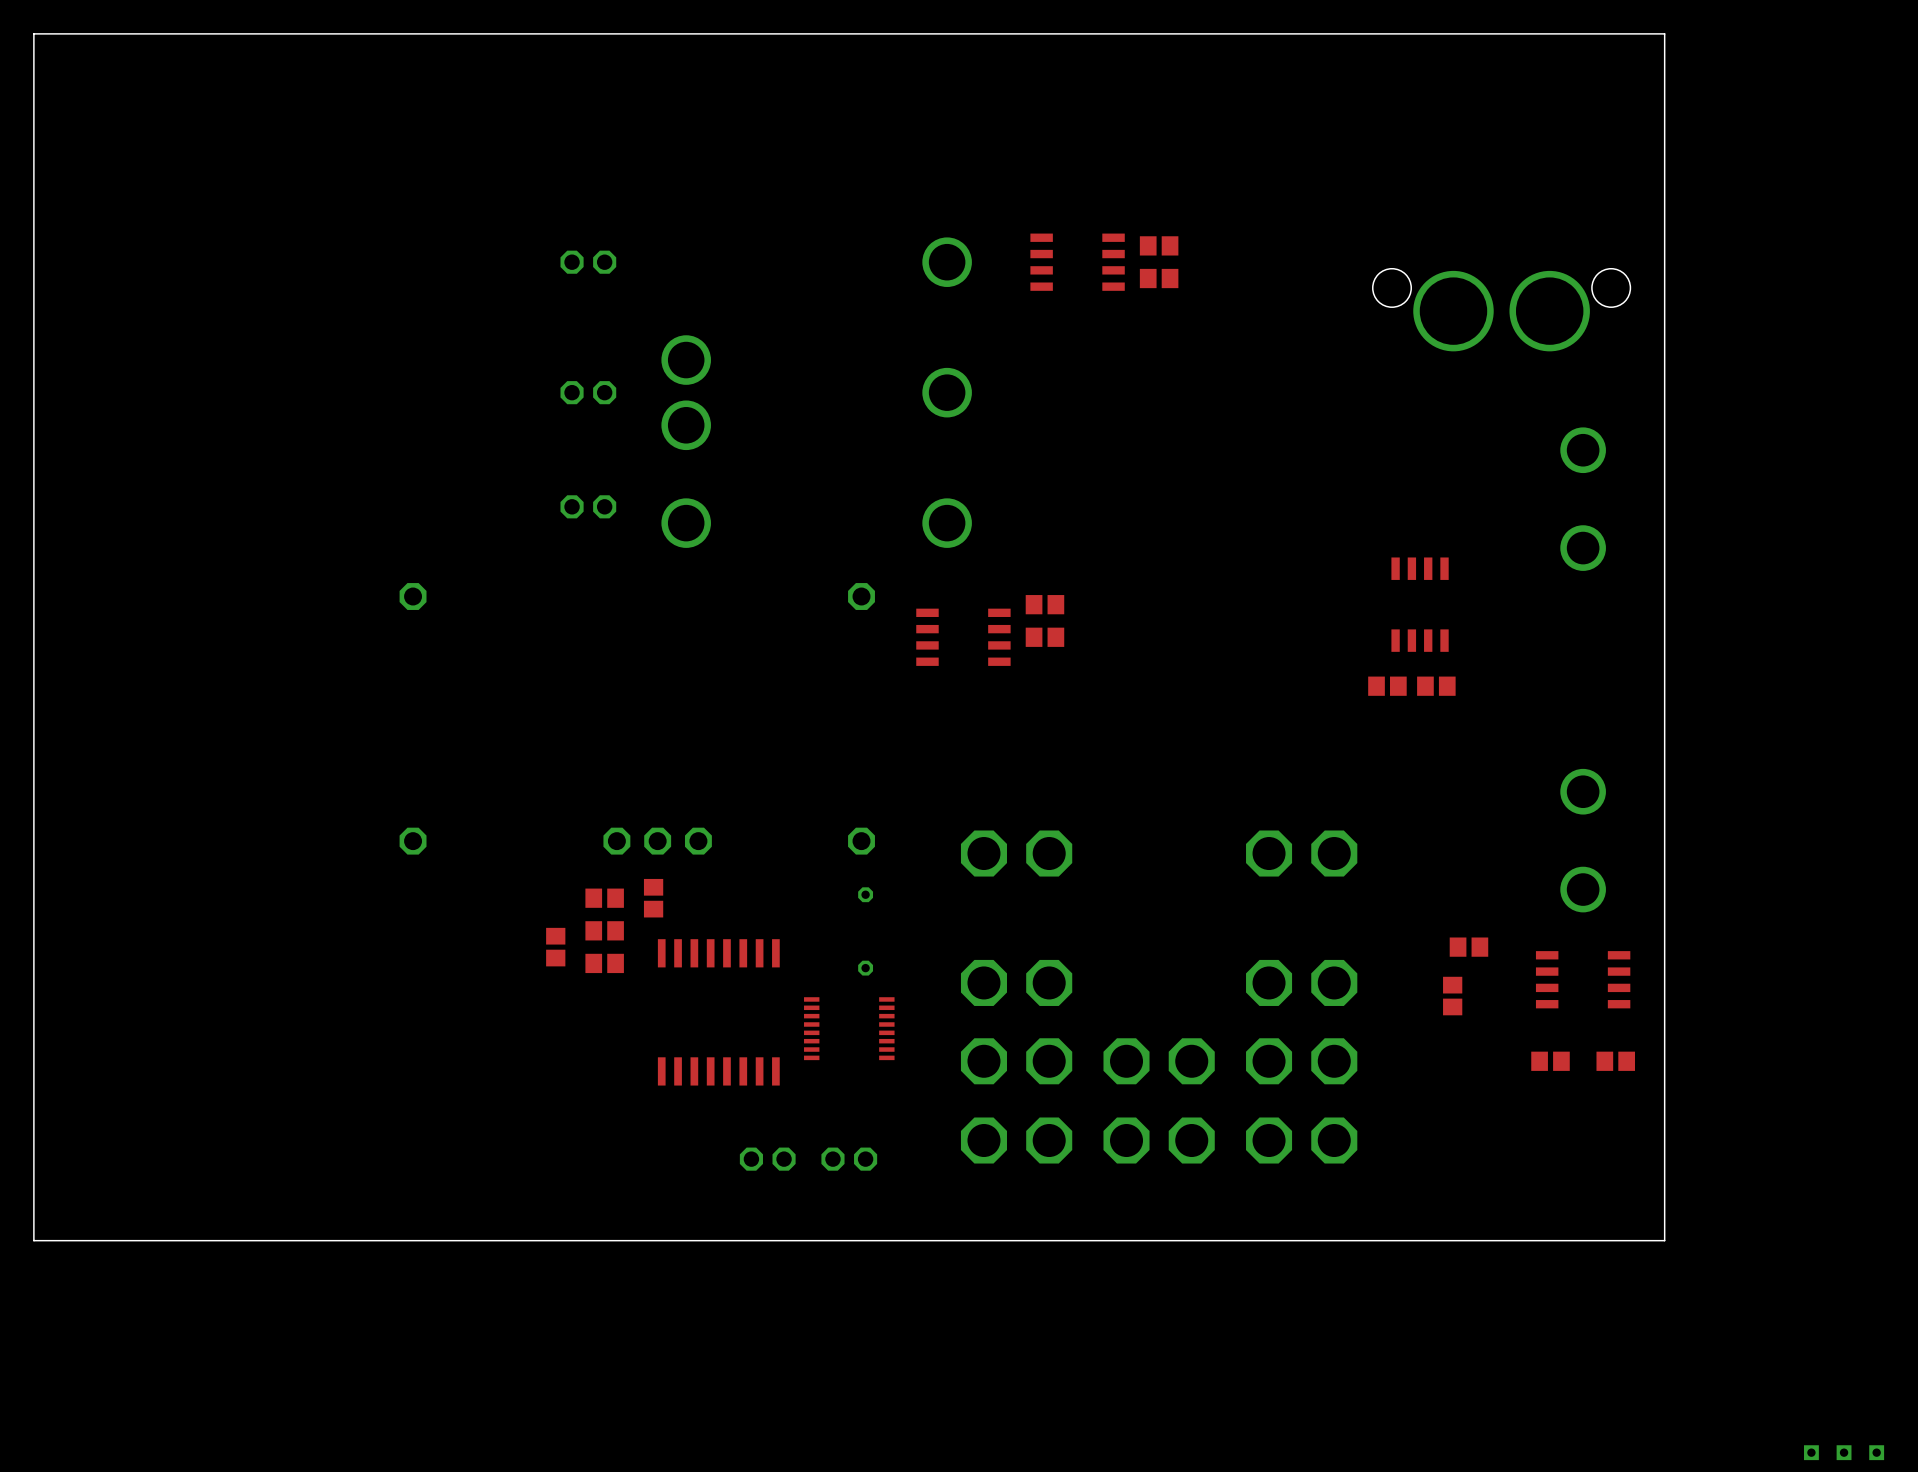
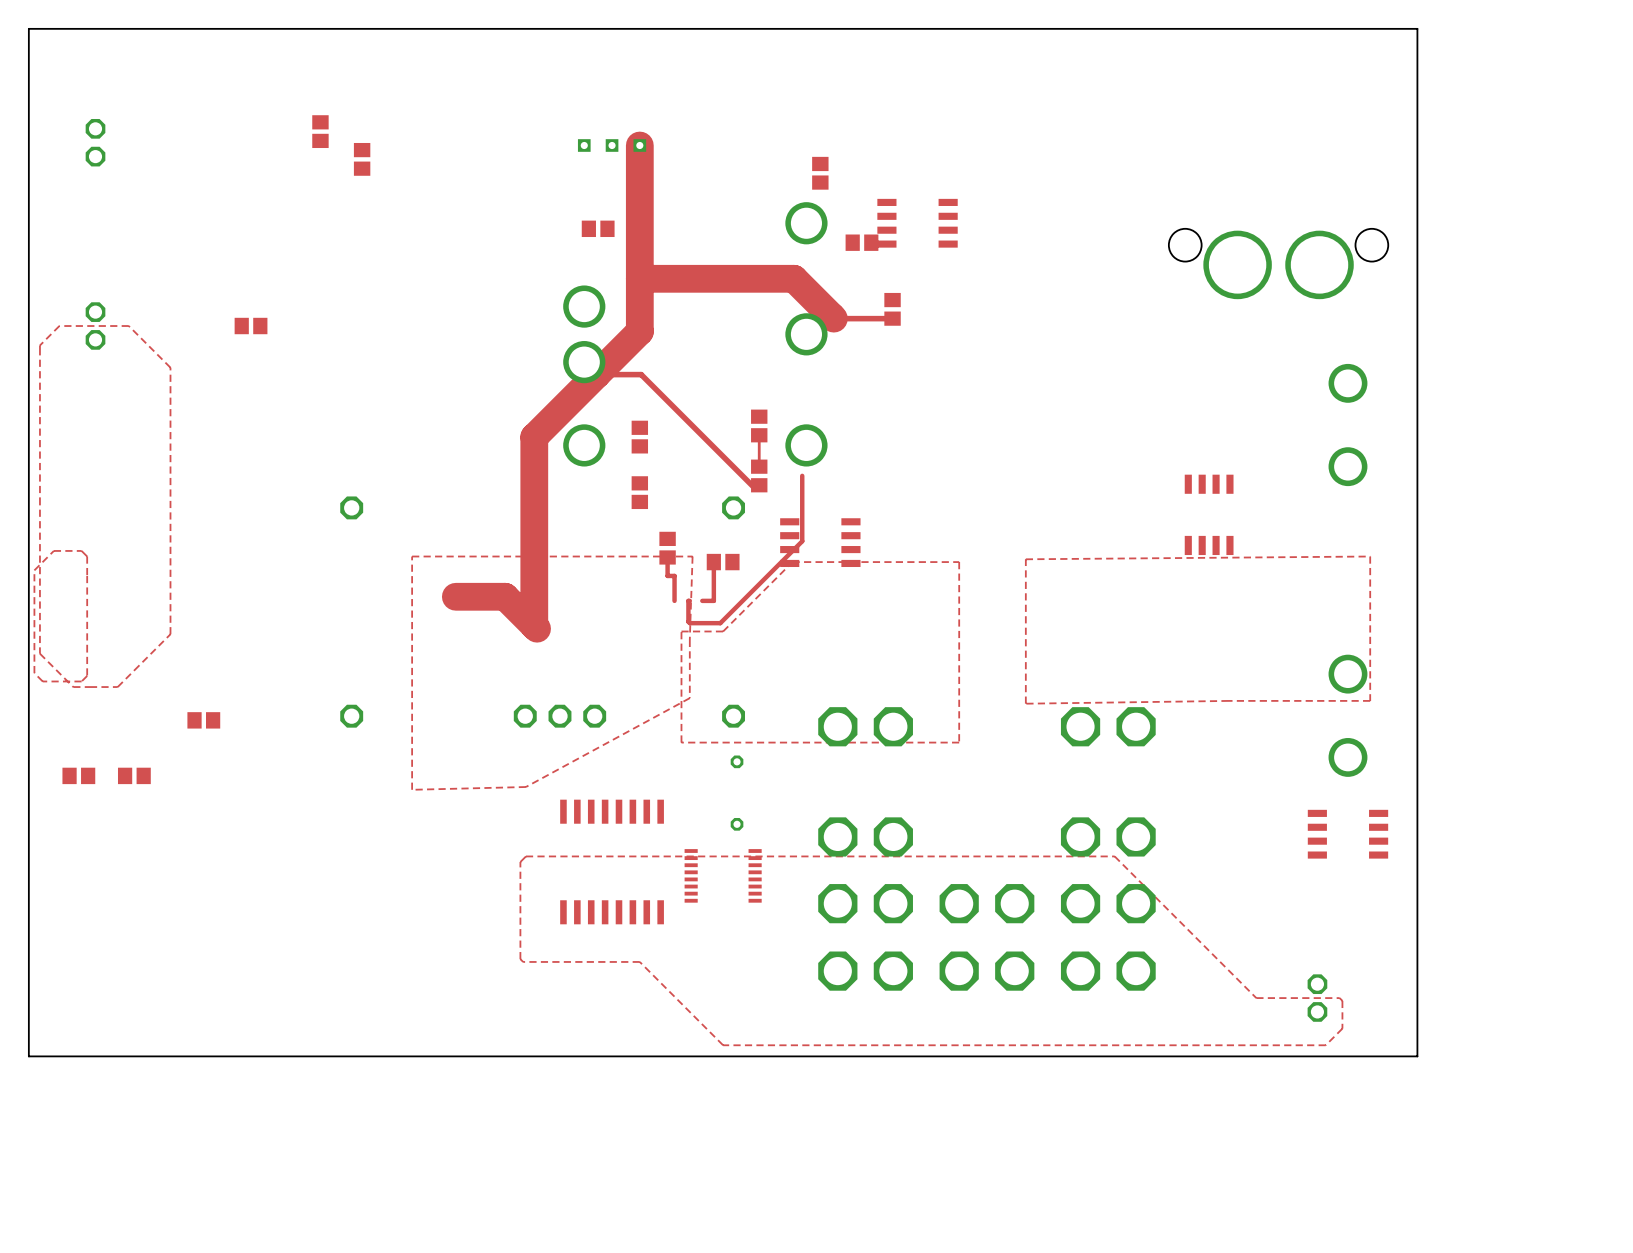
part: none -> (320, 131)
part: none -> (95, 142)
part: none -> (612, 145)
top track: none -> (639, 145) (639, 331) (534, 437) (534, 625)
part: none -> (362, 159)
part: none -> (820, 173)
part: (1159, 245) -> none
part: (588, 262) -> none
part: none -> (598, 228)
part: (1159, 278) -> none
part: none -> (861, 242)
top track: none -> (639, 278) (794, 278) (833, 318) (892, 318)
part: none -> (892, 309)
part: none -> (95, 326)
top zone outline: none -> (128, 326) (170, 367) (170, 634) (117, 687) (73, 687) (39, 653) (39, 345) (59, 326) (128, 326)
part: none -> (251, 326)
part: (588, 392) -> none
top track: none -> (596, 374) (641, 374) (753, 487)
part: none -> (759, 425)
part: (588, 506) -> none
top track: none -> (759, 435) (759, 466)
part: none -> (639, 437)
top track: none -> (802, 475) (802, 541) (720, 623) (689, 623) (689, 600)
part: none -> (759, 475)
part: none -> (639, 492)
part: (1044, 604) -> none
part: (1044, 637) -> none
part: none -> (667, 548)
top zone outline: none -> (81, 550) (53, 550) (34, 570) (34, 673) (42, 681) (81, 681) (87, 675) (87, 556) (81, 550)
top zone outline: none -> (692, 556) (412, 556) (412, 789) (525, 787) (689, 698) (692, 556)
top zone outline: none -> (1370, 556) (1370, 700) (1025, 703) (1025, 559) (1370, 556)
top track: none -> (667, 557) (667, 575) (674, 575) (674, 600)
top track: none -> (713, 562) (713, 600) (702, 600)
part: none -> (723, 562)
top zone outline: none -> (959, 562) (959, 742) (681, 742) (681, 631) (723, 631) (792, 562) (959, 562)
part: (1387, 686) -> none
part: (1436, 686) -> none
top track: none -> (455, 596) (505, 596) (537, 628)
part: none -> (203, 720)
part: (604, 898) -> none
part: (653, 898) -> none
part: none -> (78, 775)
part: none -> (134, 775)
part: (604, 930) -> none
part: (555, 947) -> none
part: (1468, 947) -> none
part: (604, 963) -> none
part: (1452, 996) -> none
top zone outline: none -> (1114, 856) (525, 856) (520, 861) (520, 959) (523, 961) (639, 961) (723, 1045) (1325, 1045) (1342, 1028) (1342, 1000) (1339, 998) (1256, 998) (1114, 856)
part: (1550, 1061) -> none
part: (1615, 1061) -> none
part: (767, 1159) -> none
part: (849, 1159) -> none
part: none -> (1317, 998)
part: (1844, 1452) -> none

